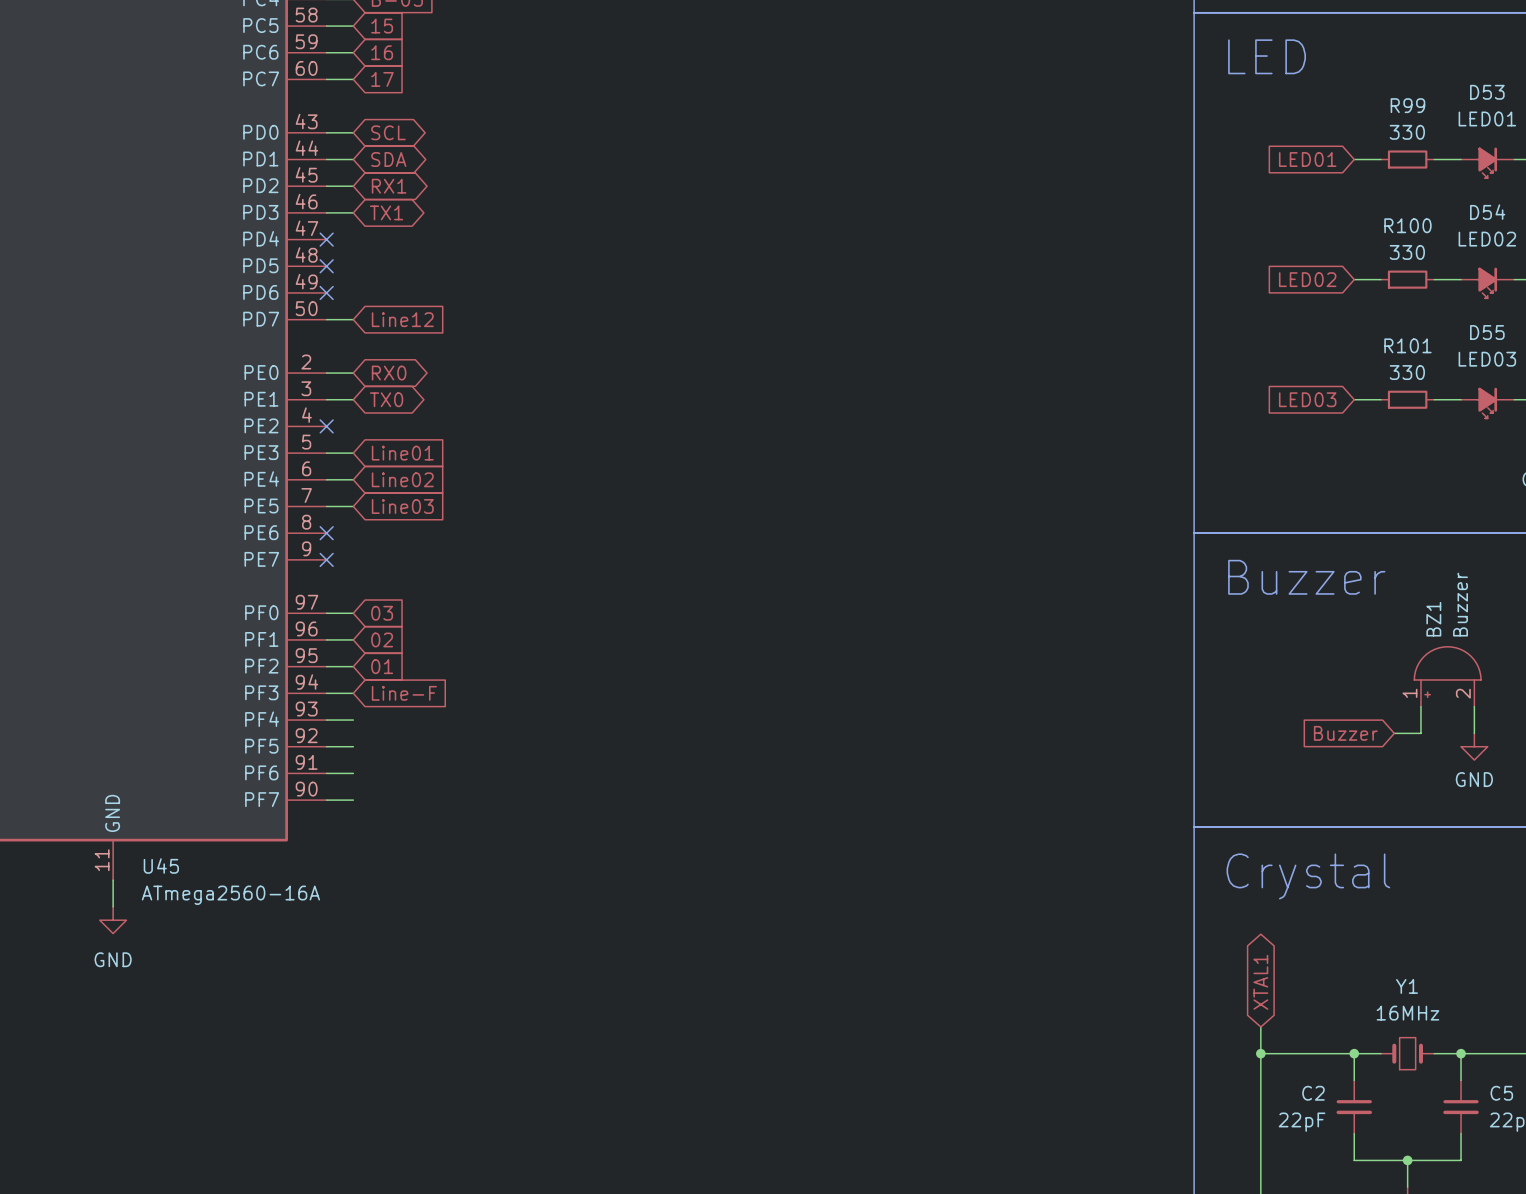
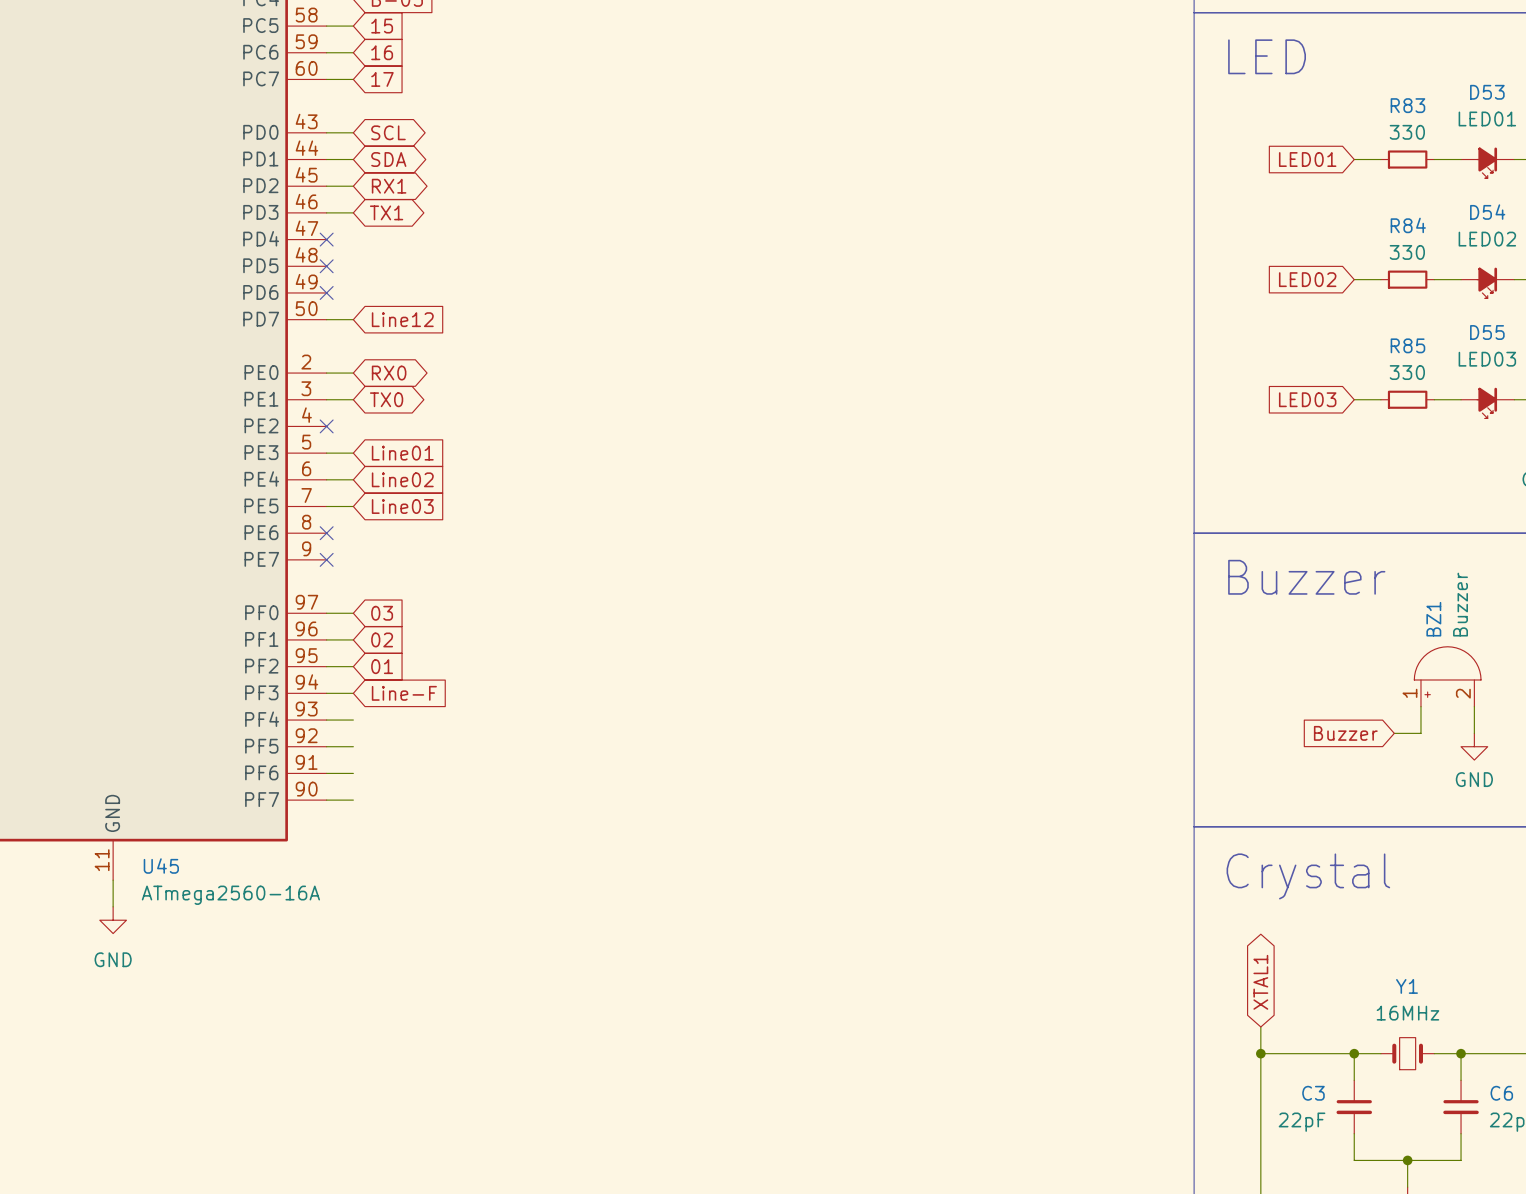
R99 name: R99 (1407, 105) -> R83 (1407, 105)
R100 name: R100 (1407, 225) -> R84 (1408, 225)
R101 name: R101 (1407, 345) -> R85 (1407, 345)
C2 name: C2 (1313, 1093) -> C3 (1313, 1093)
C5 name: C5 (1501, 1093) -> C6 (1501, 1093)

